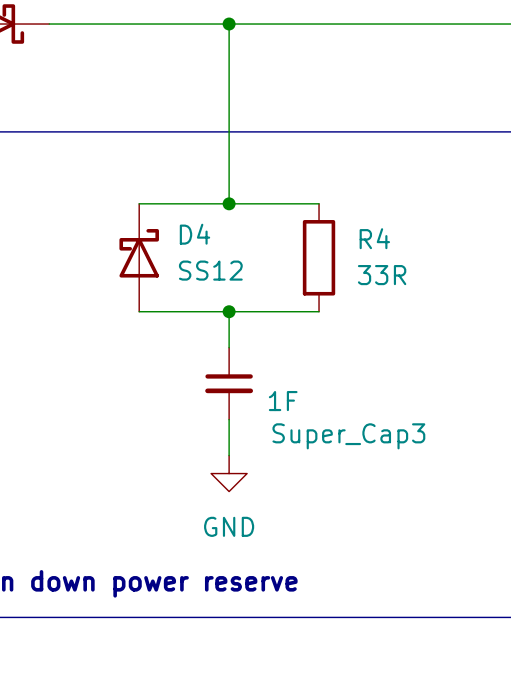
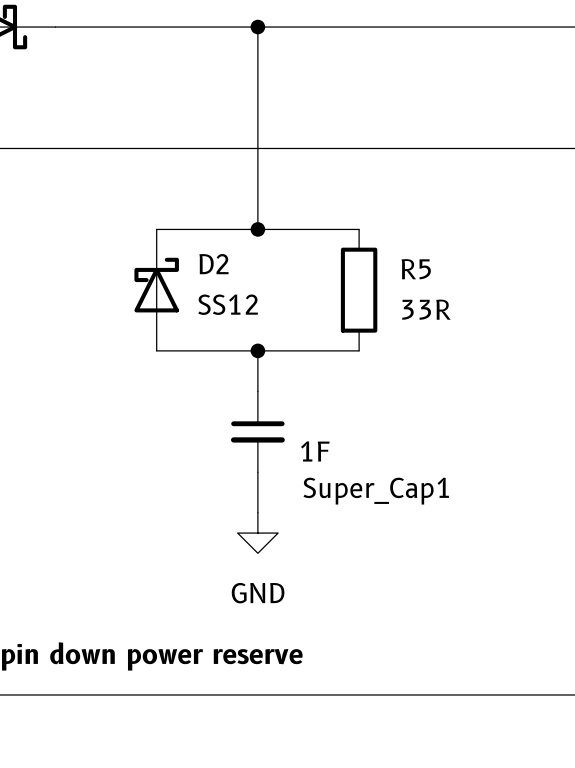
D4 name: D4 (194, 234) -> D2 (213, 264)
R4 name: R4 (374, 238) -> R5 (416, 269)
Super_Cap3 name: Super_Cap3 (348, 436) -> Super_Cap1 (376, 491)

